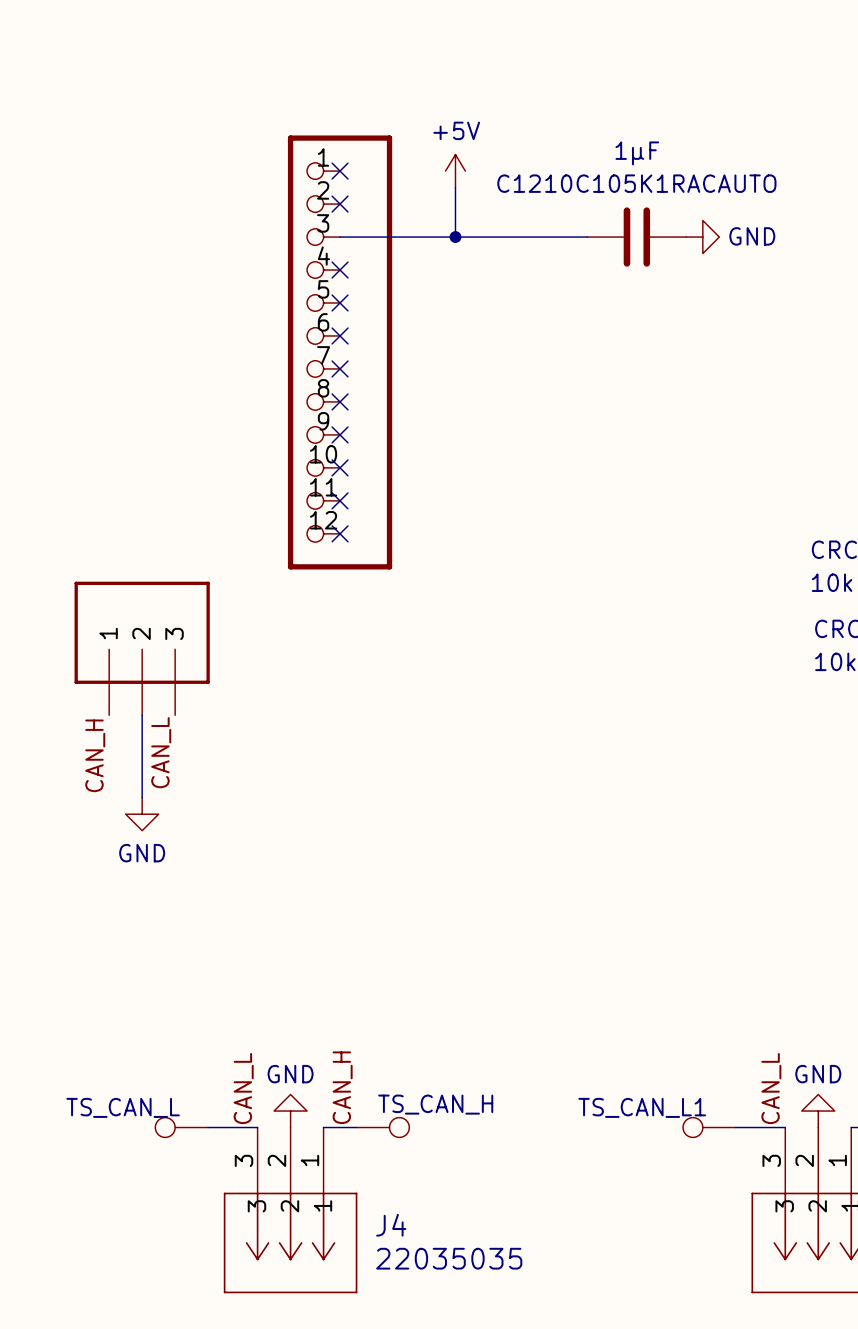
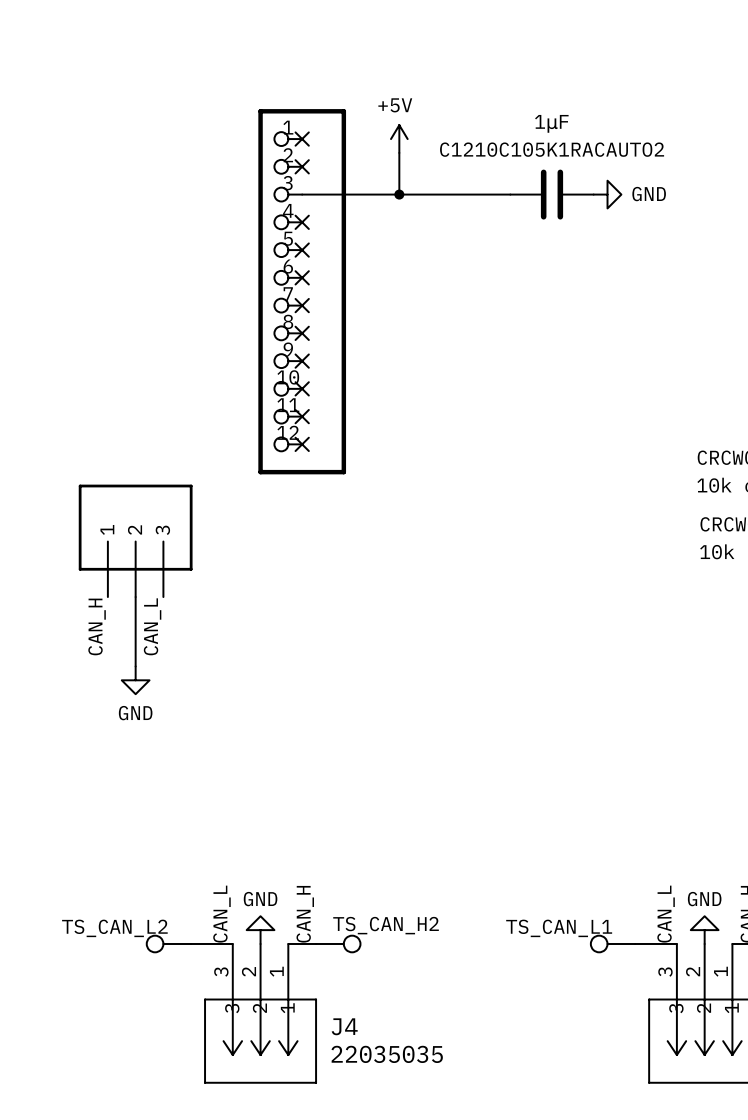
C1210C105K1RACAUTO name: C1210C105K1RACAUTO (636, 183) -> C1210C105K1RACAUTO2 (552, 149)
TS_CAN_H name: TS_CAN_H (435, 1104) -> TS_CAN_H2 (386, 925)
TS_CAN_L name: TS_CAN_L (123, 1107) -> TS_CAN_L2 (114, 928)

